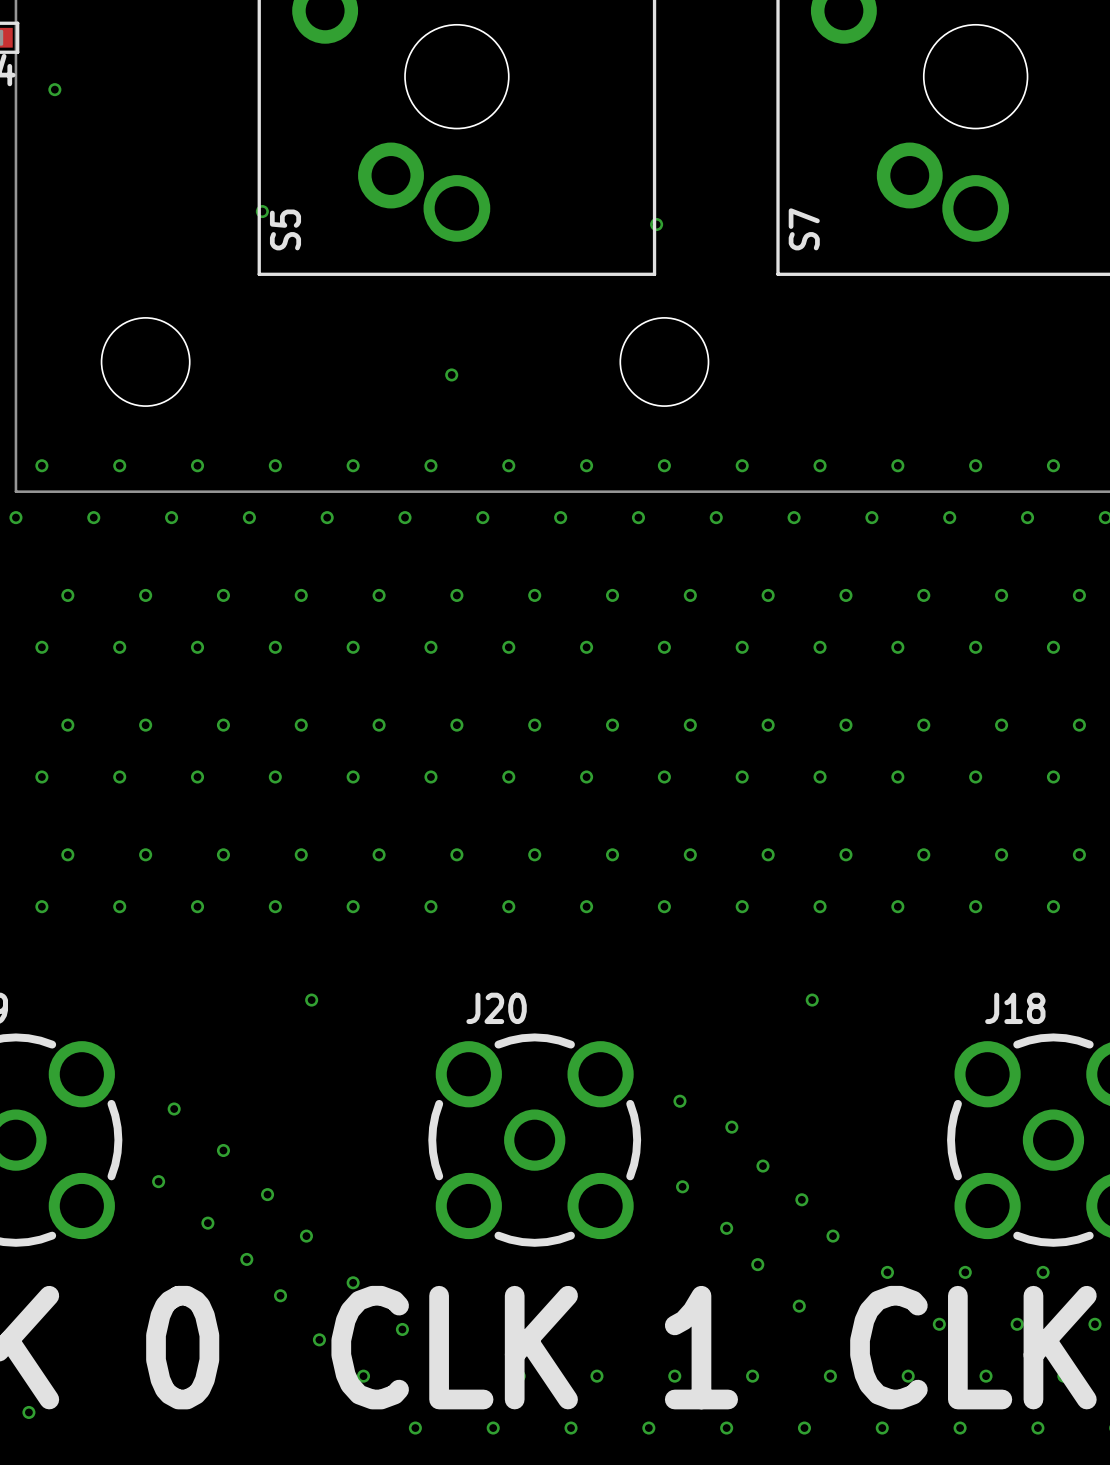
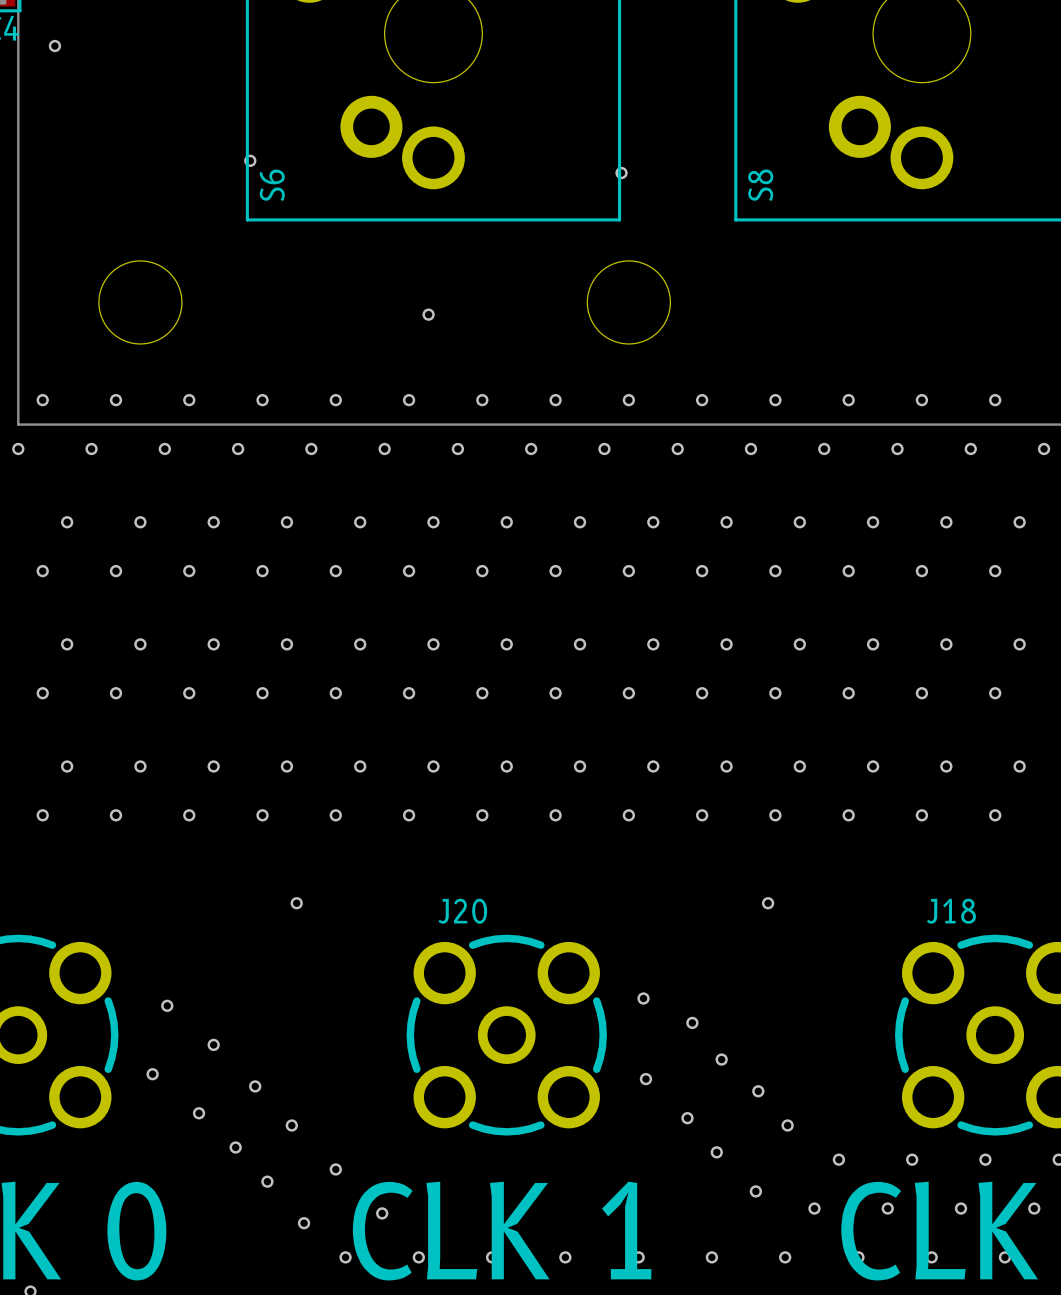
S5 name: S5 (285, 229) -> S6 (272, 185)
S7 name: S7 (804, 229) -> S8 (760, 185)

